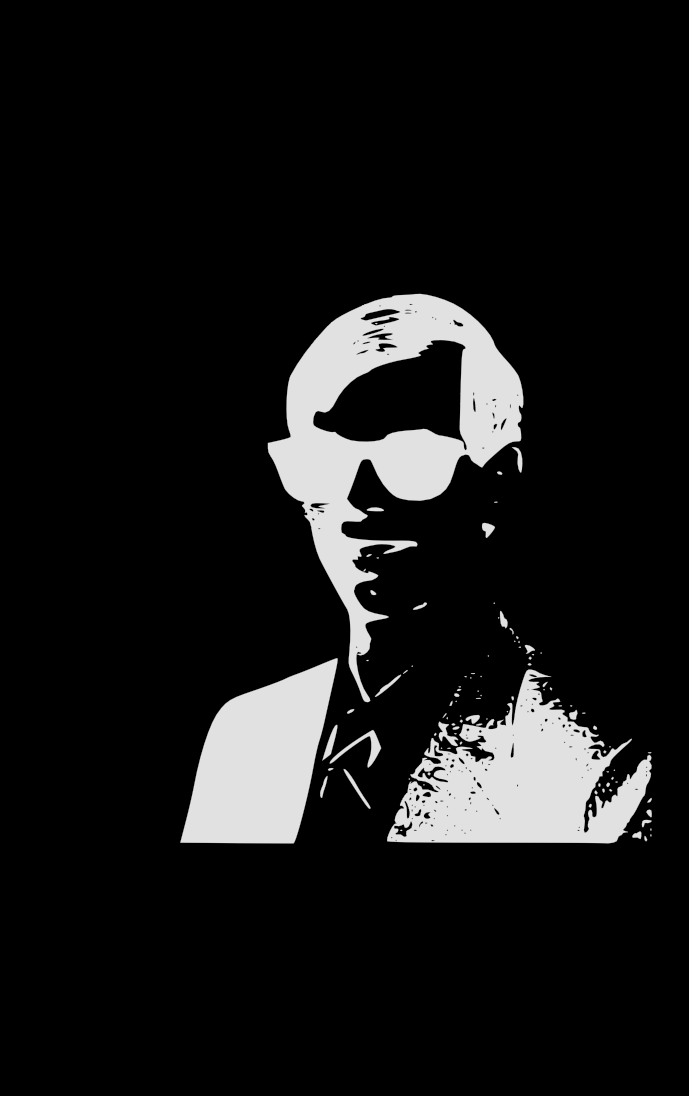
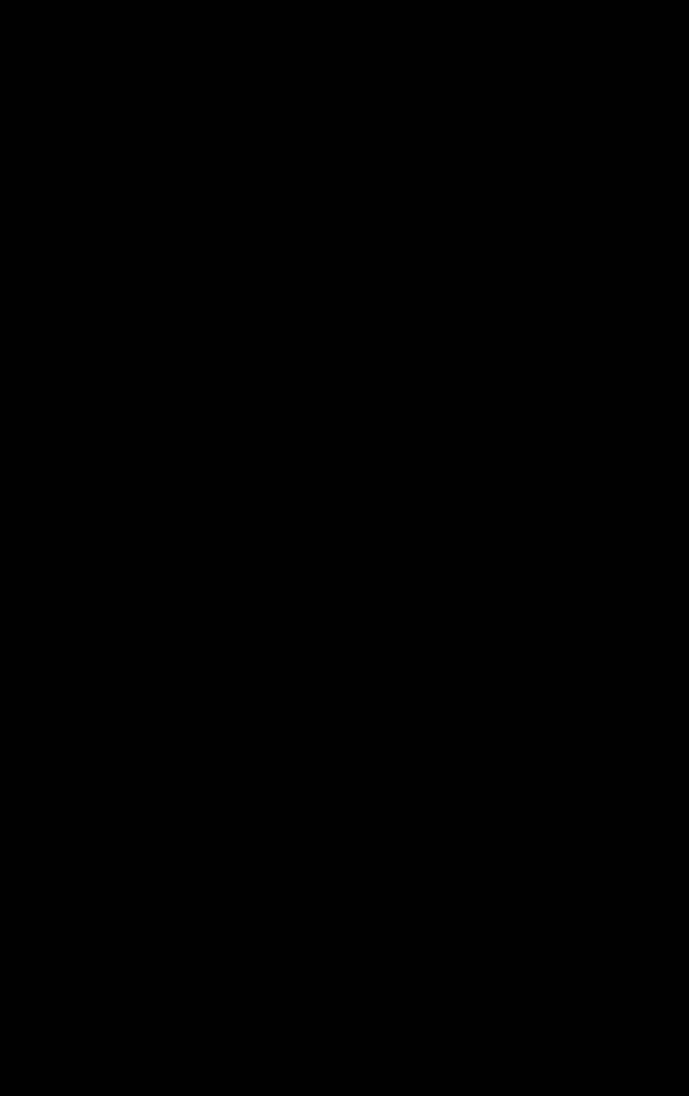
drawing: [180, 293, 652, 844] -> none

